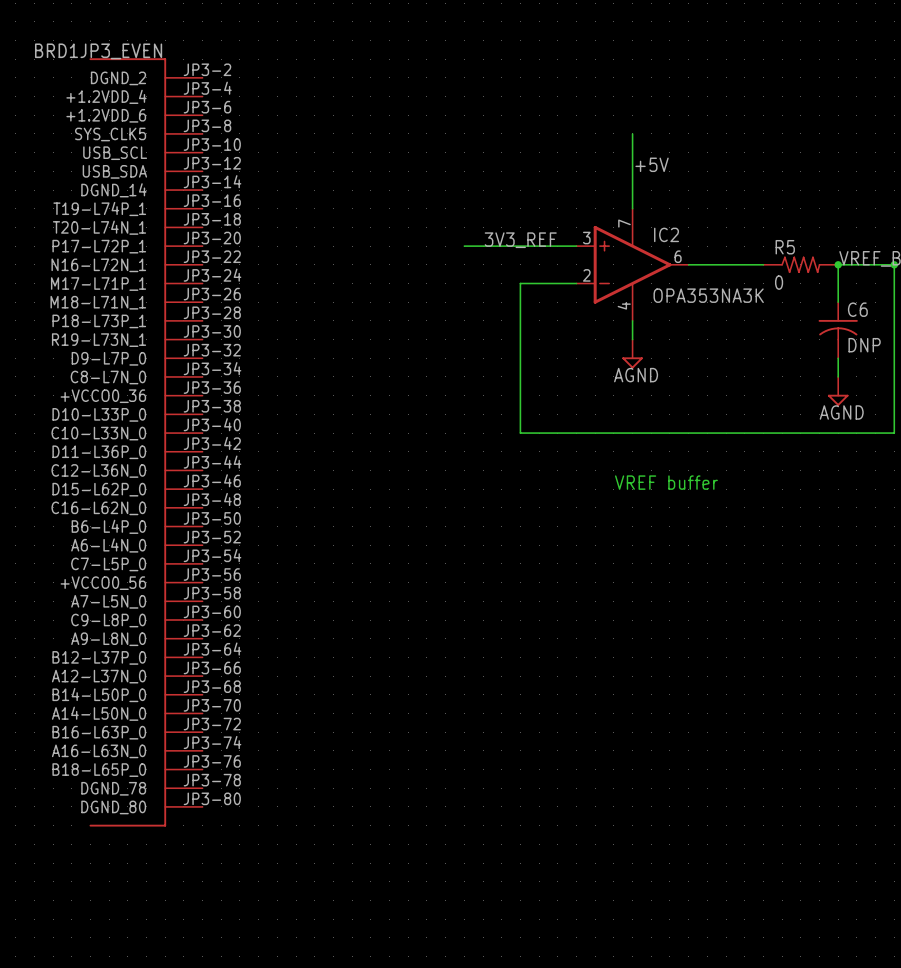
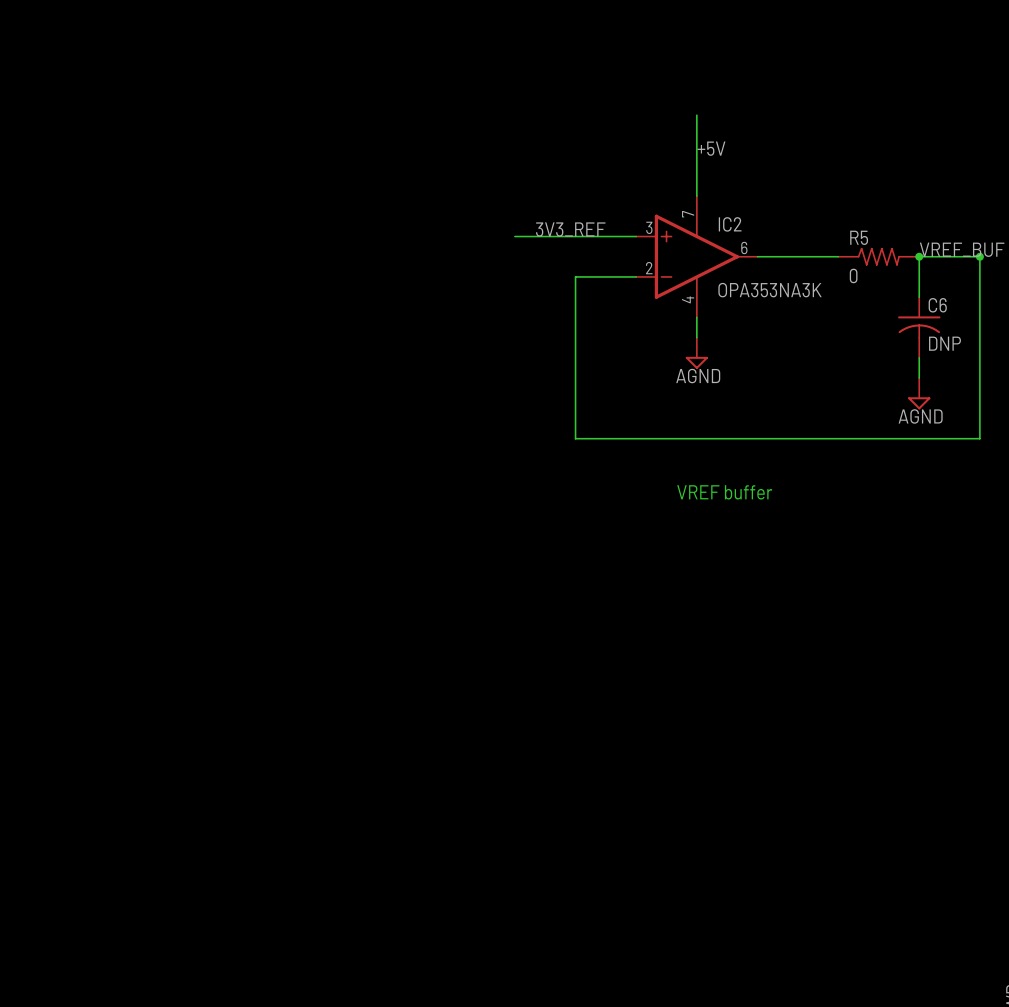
BRD1JP3_EVEN: (146, 442) -> none

